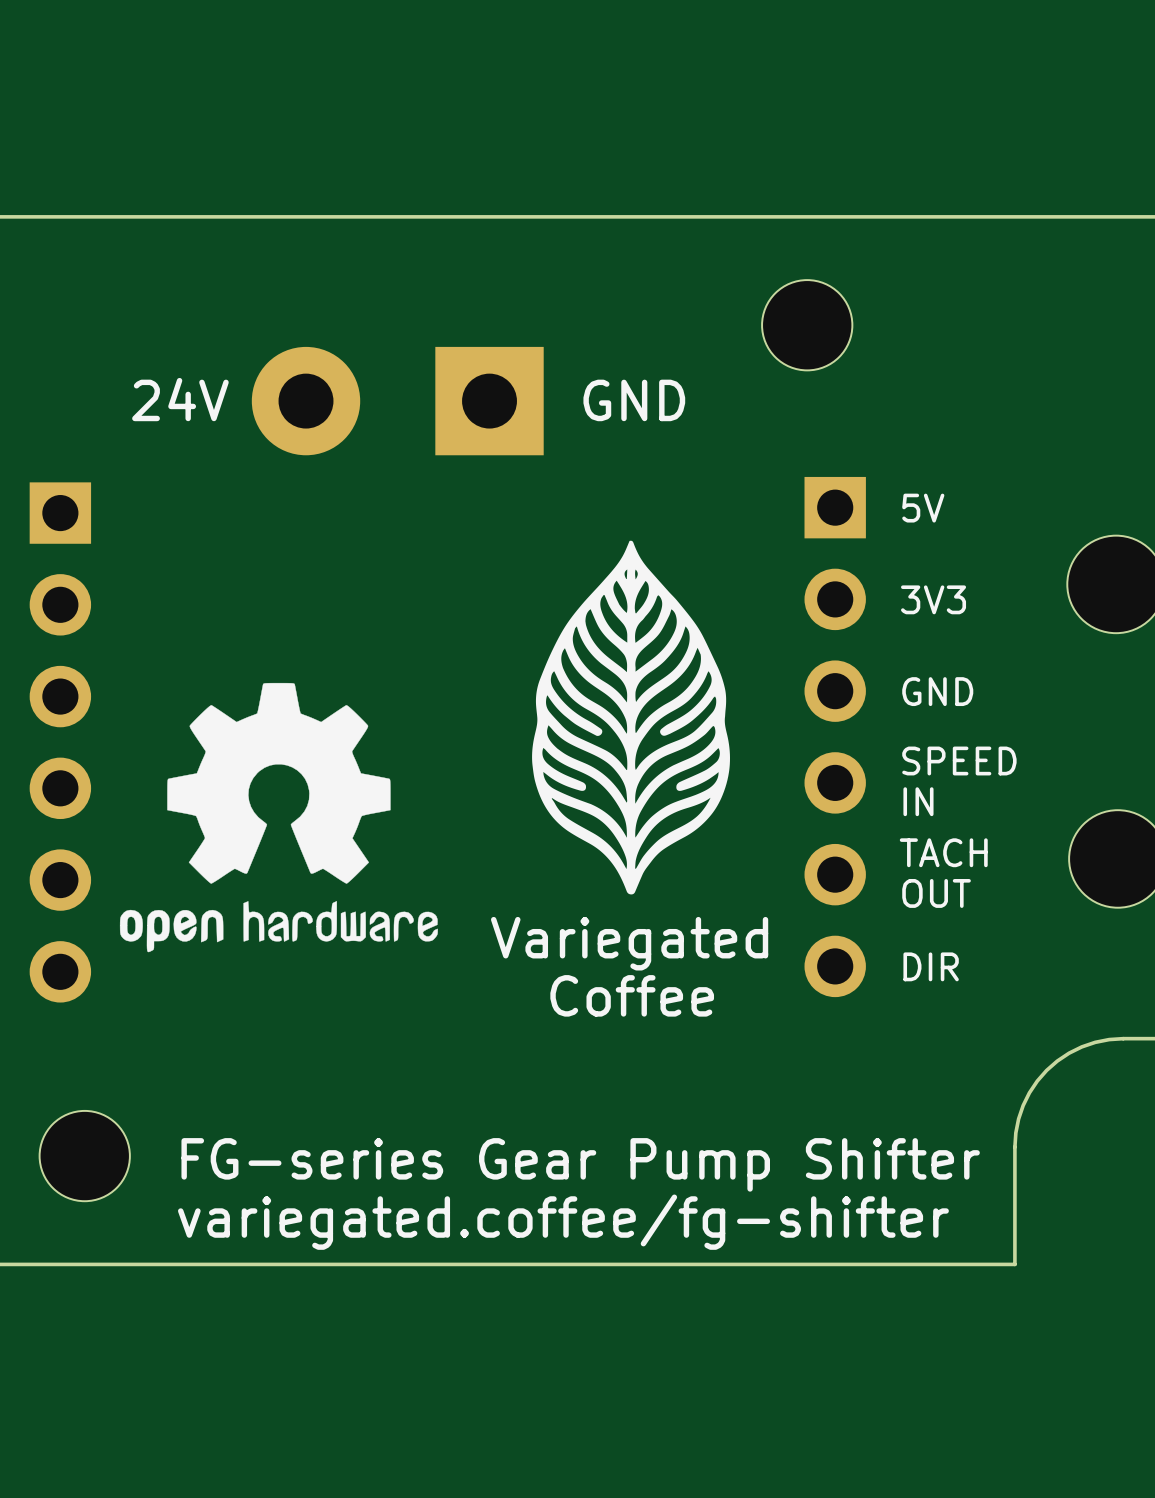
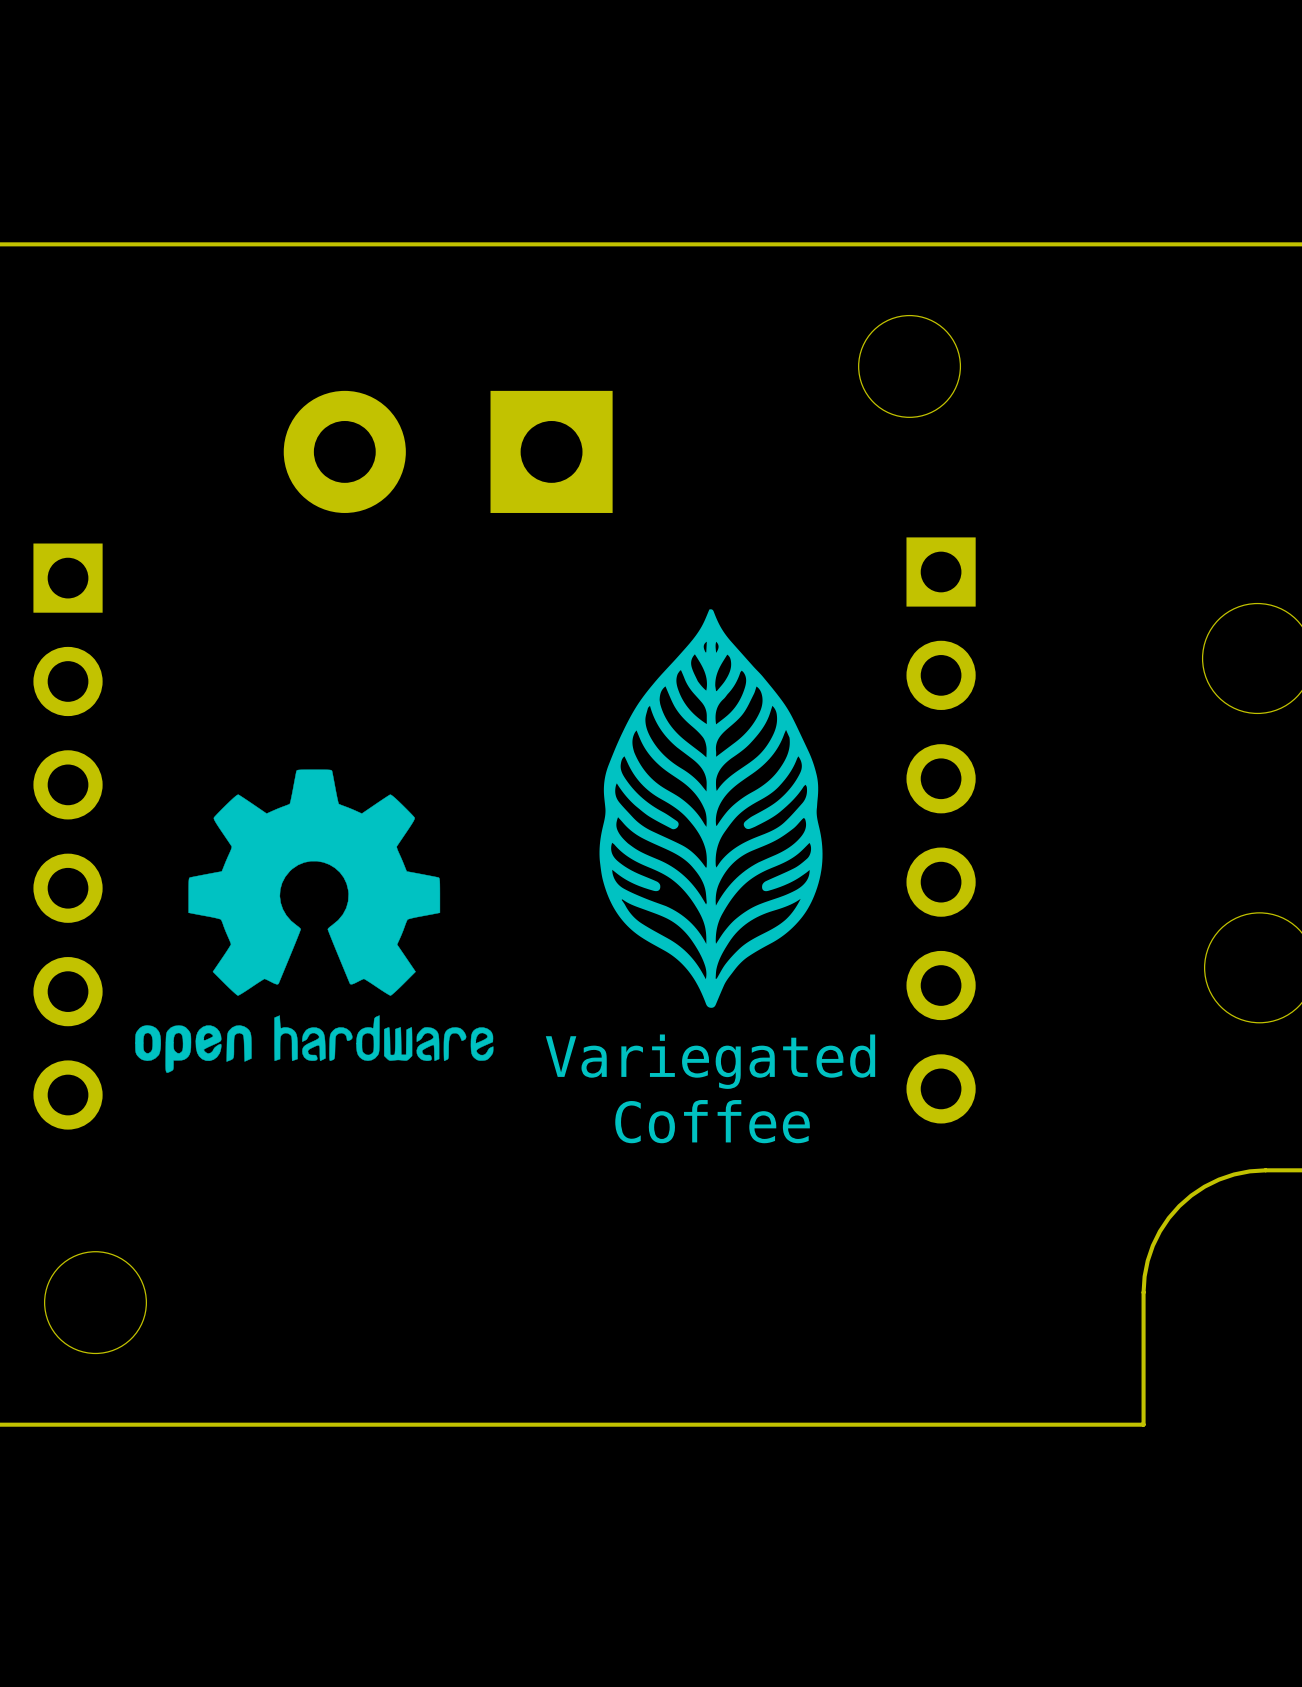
text: 24V (180, 399) -> none
text: GND (634, 400) -> none
text: 5V (923, 508) -> none
text: 3V3 (933, 599) -> none
text: GND (937, 691) -> none
text: SPEED (959, 760) -> none
text: IN (918, 801) -> none
text: TACH (943, 852) -> none
text: OUT (936, 893) -> none
text: DIR (931, 966) -> none
text: FG-series Gear Pump Shifter (580, 1164) -> none
text: variegated.coffee/fg-shifter (563, 1222) -> none

